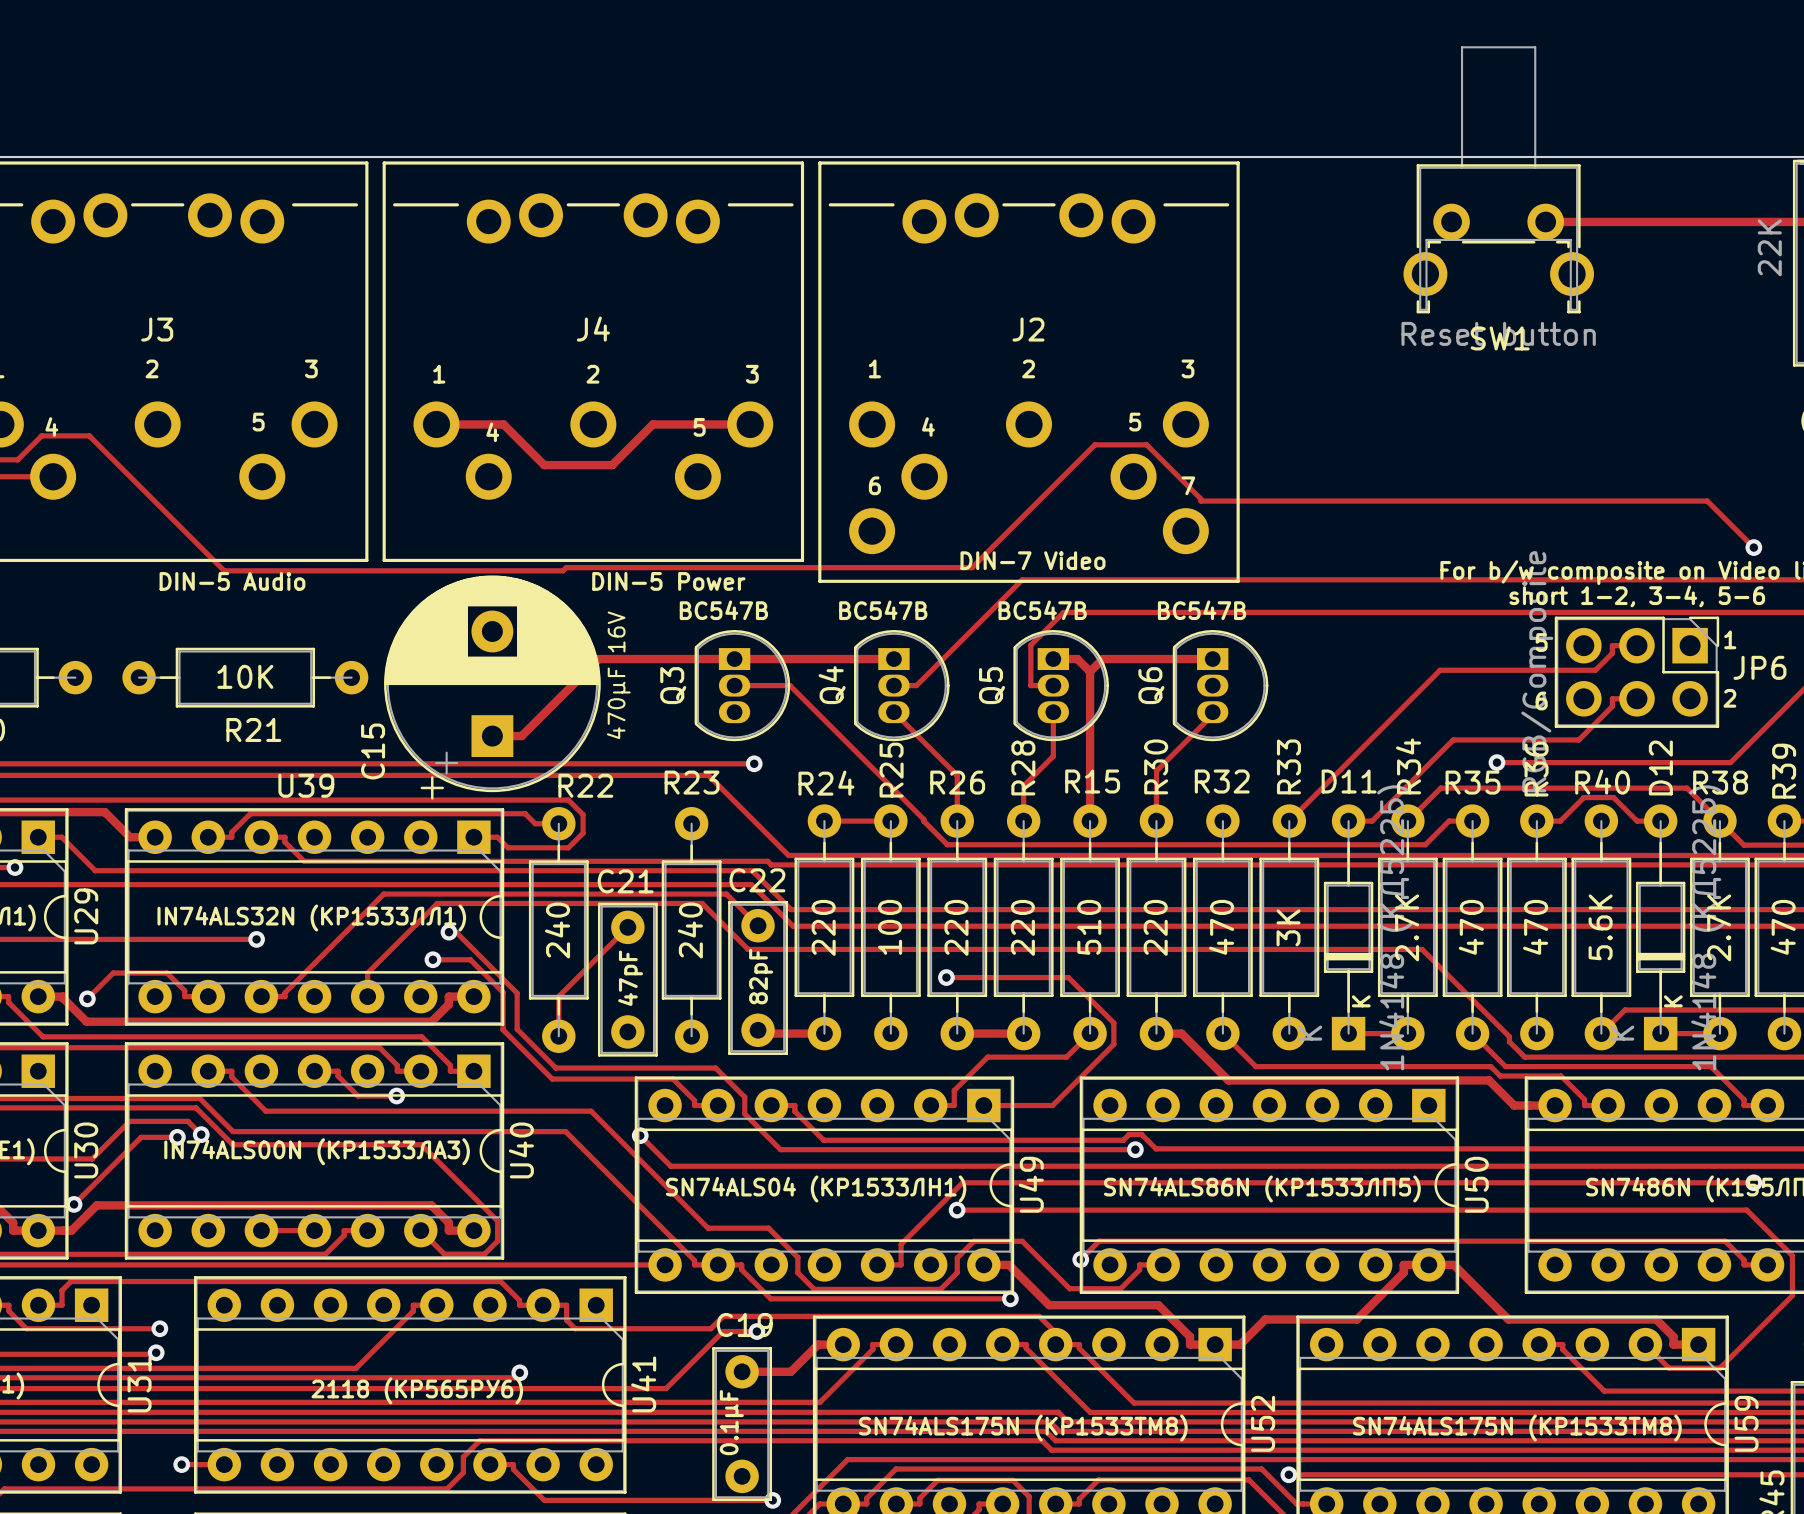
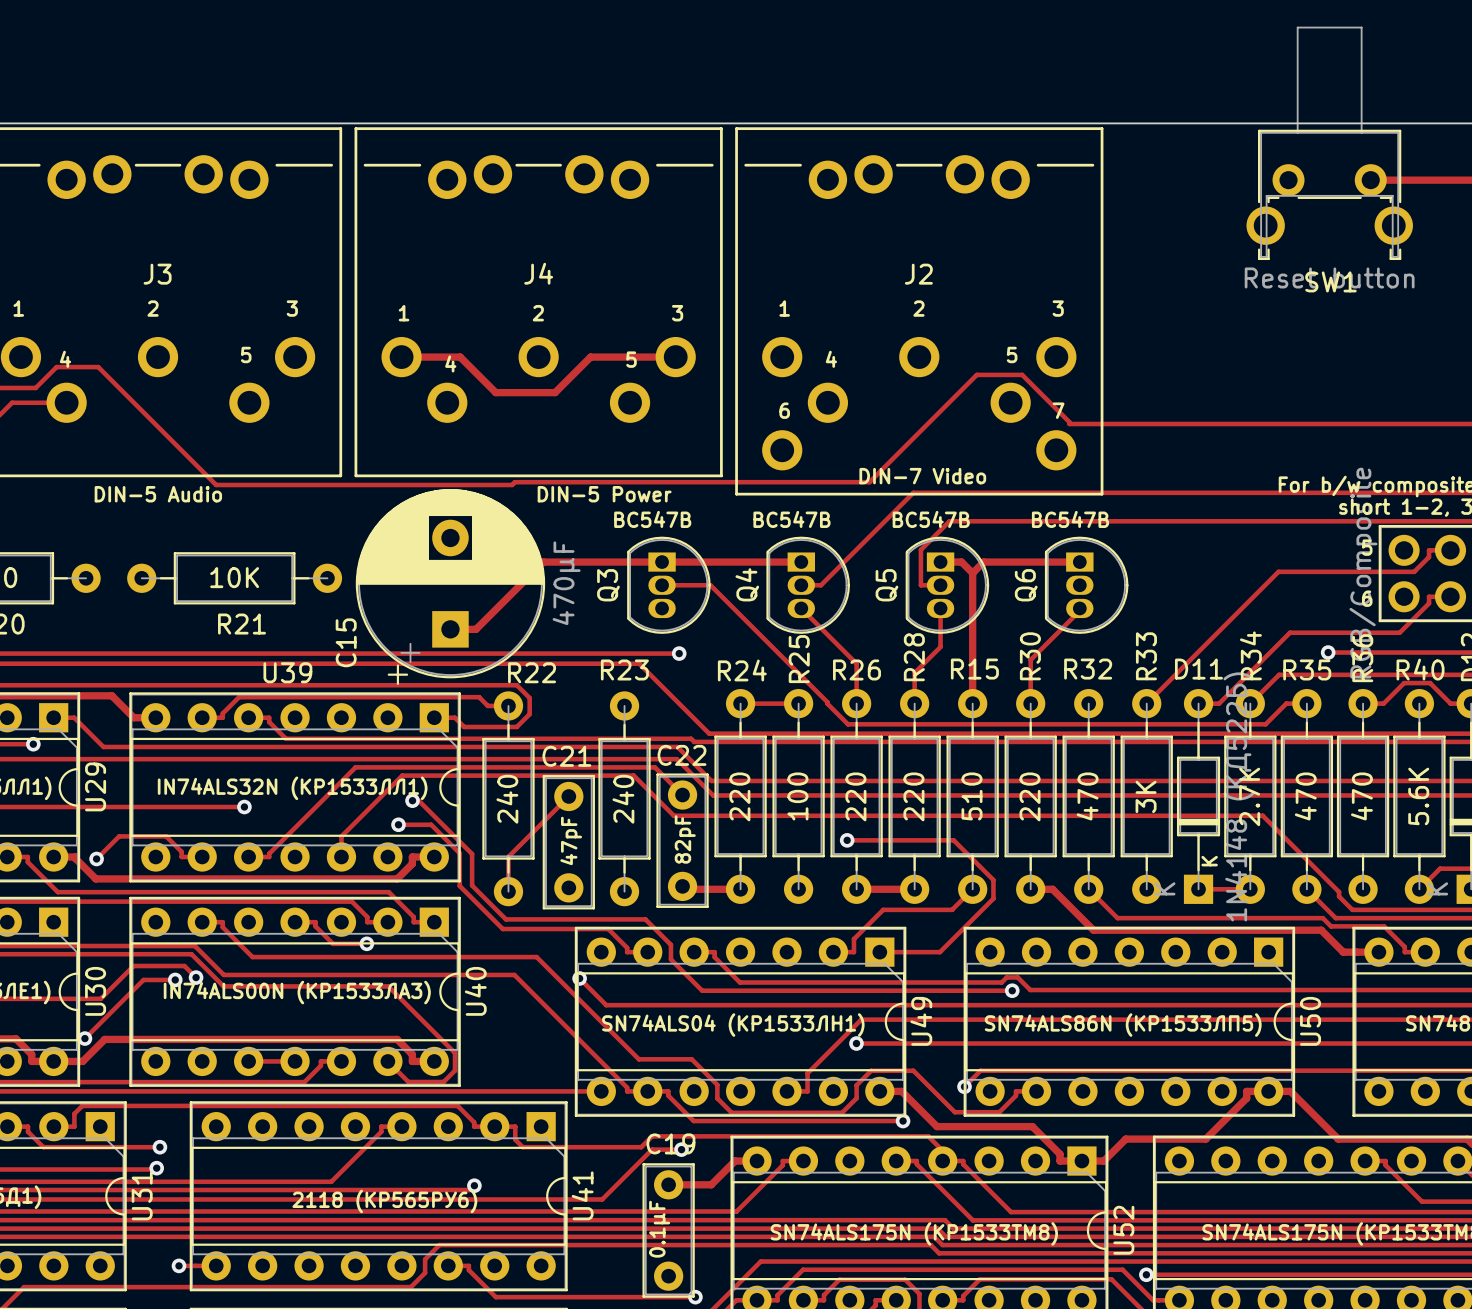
J3 value position: DIN-5 Audio (232, 581) -> DIN-5 Audio (158, 494)
C15 value: 470µF 16V (618, 675) -> 470µF (566, 583)

